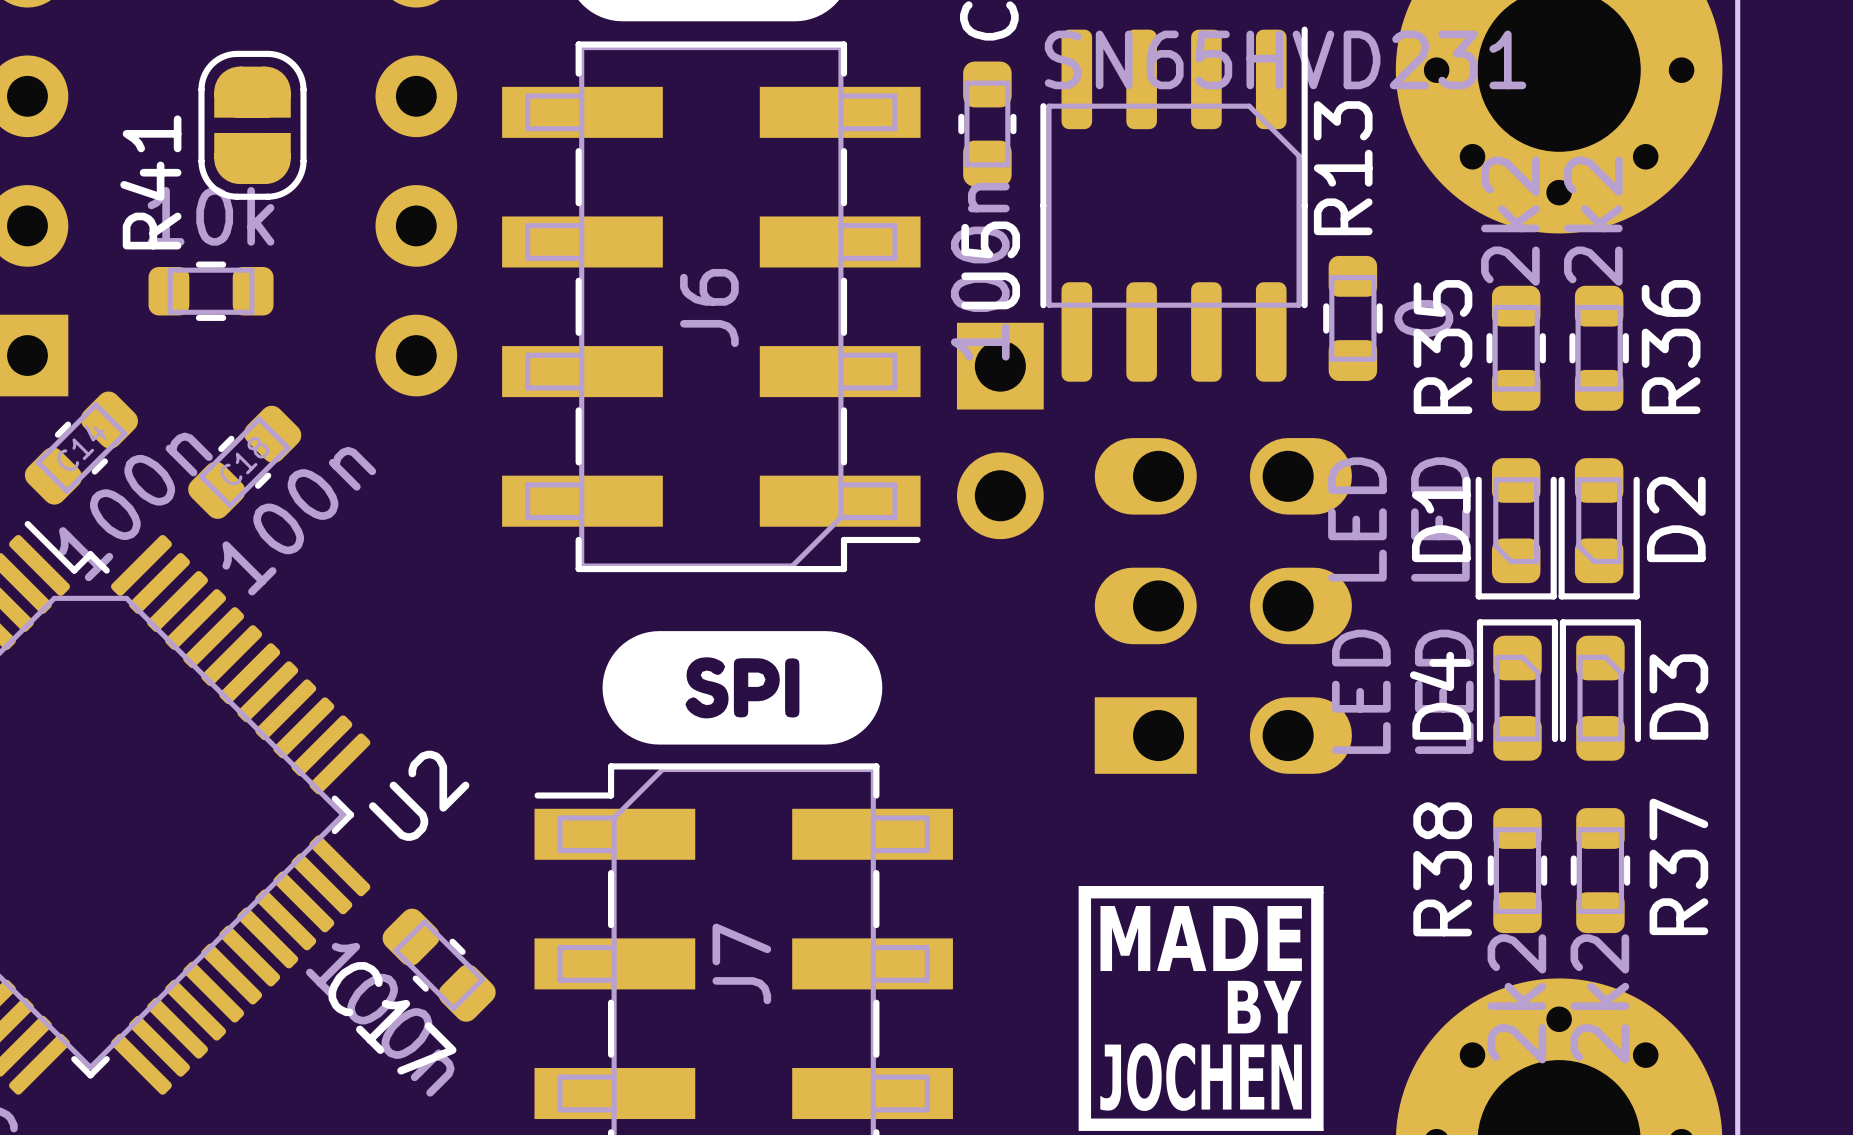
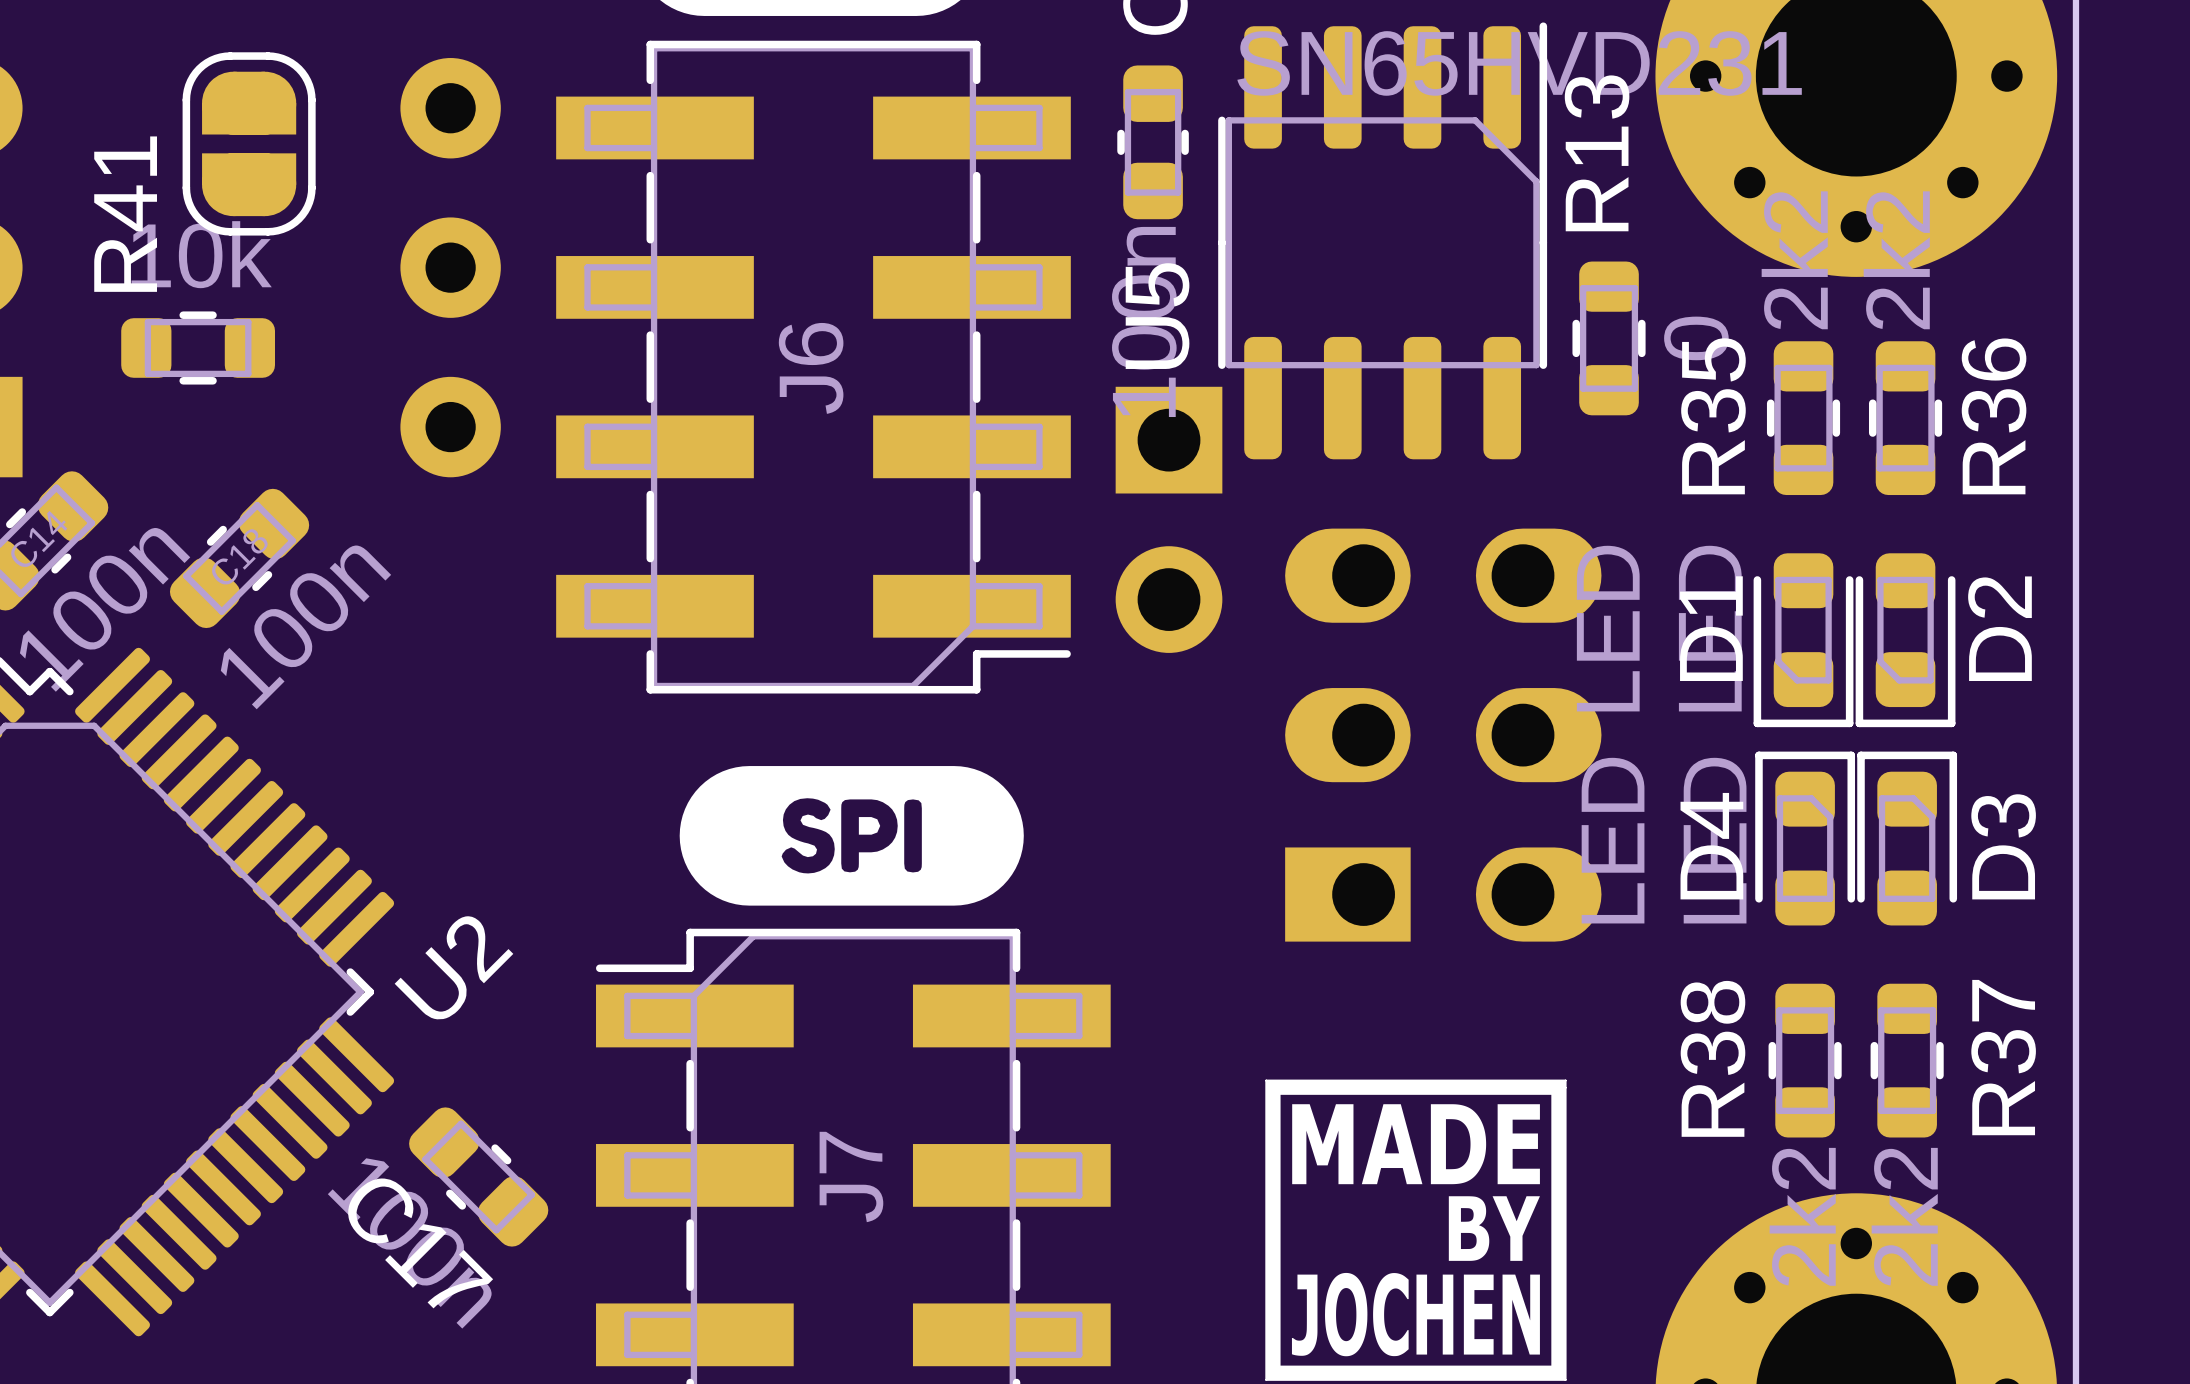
R13 position: (1352, 318) -> (1609, 338)

